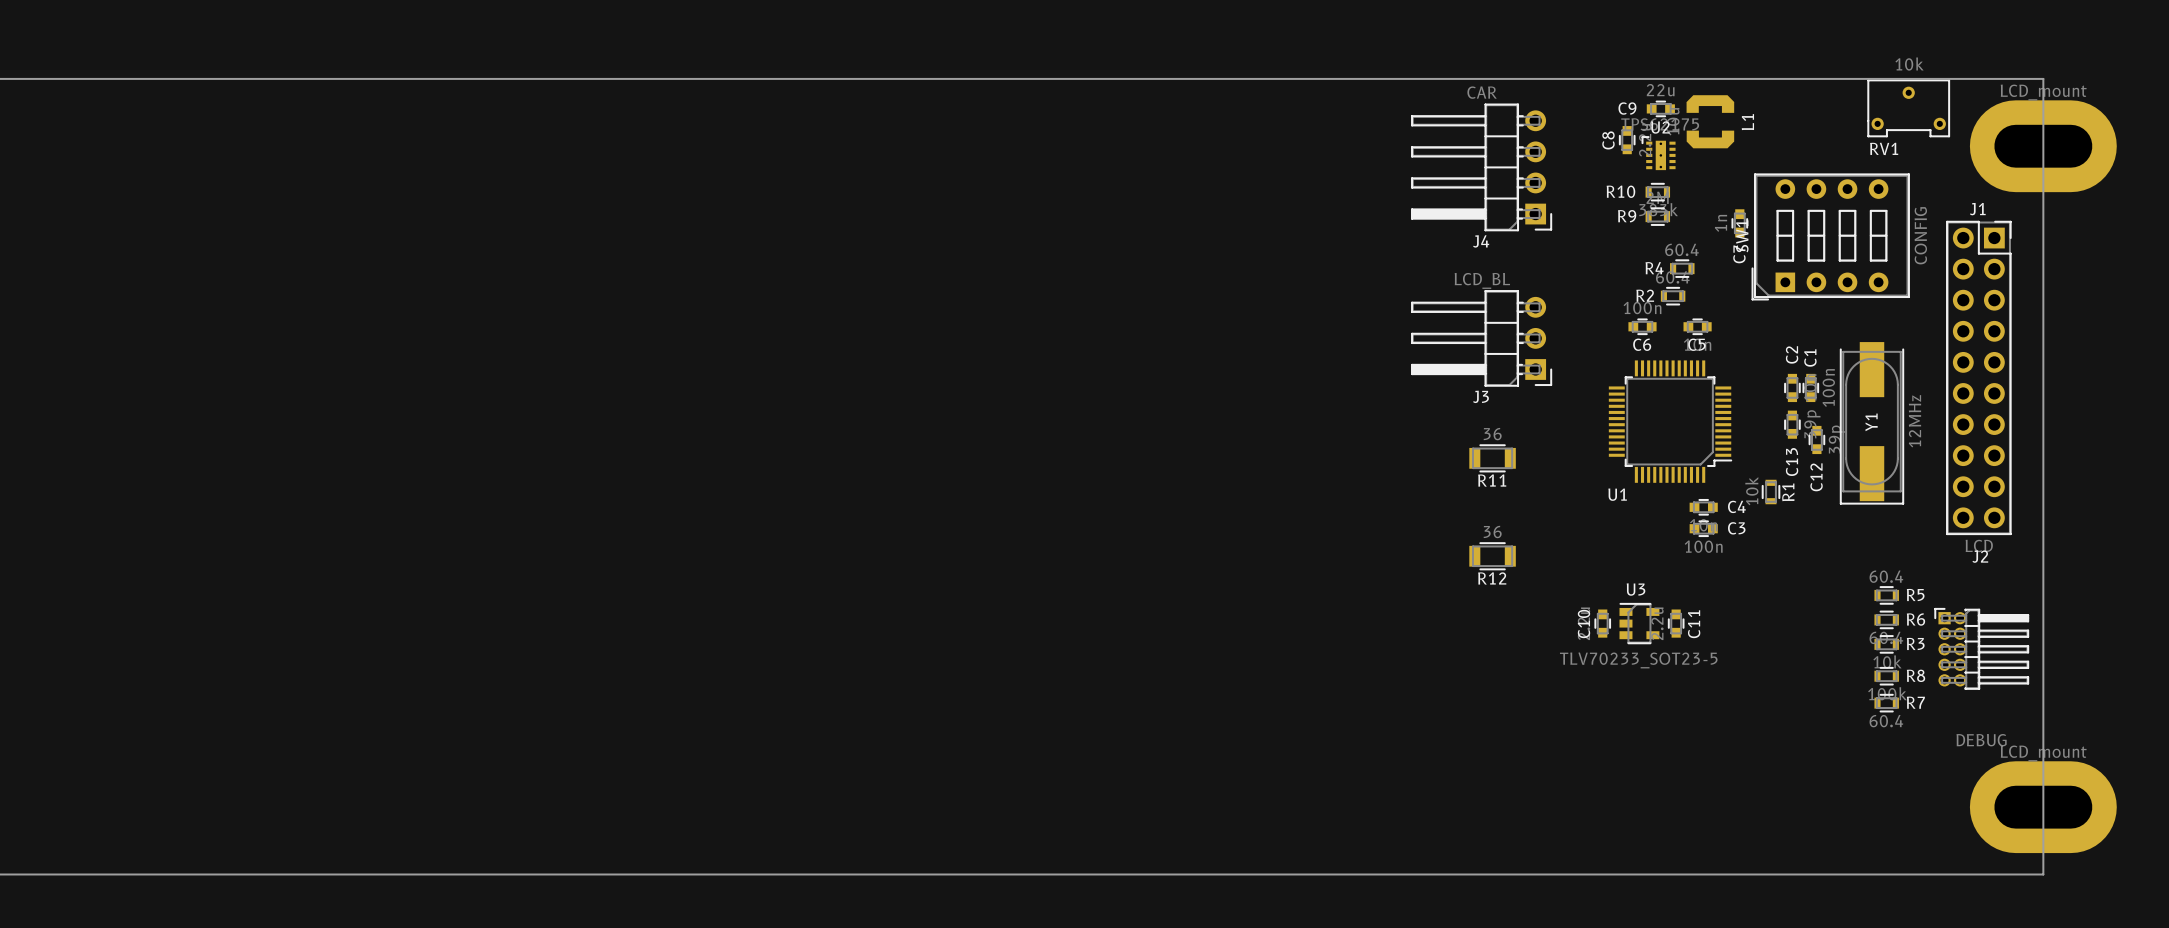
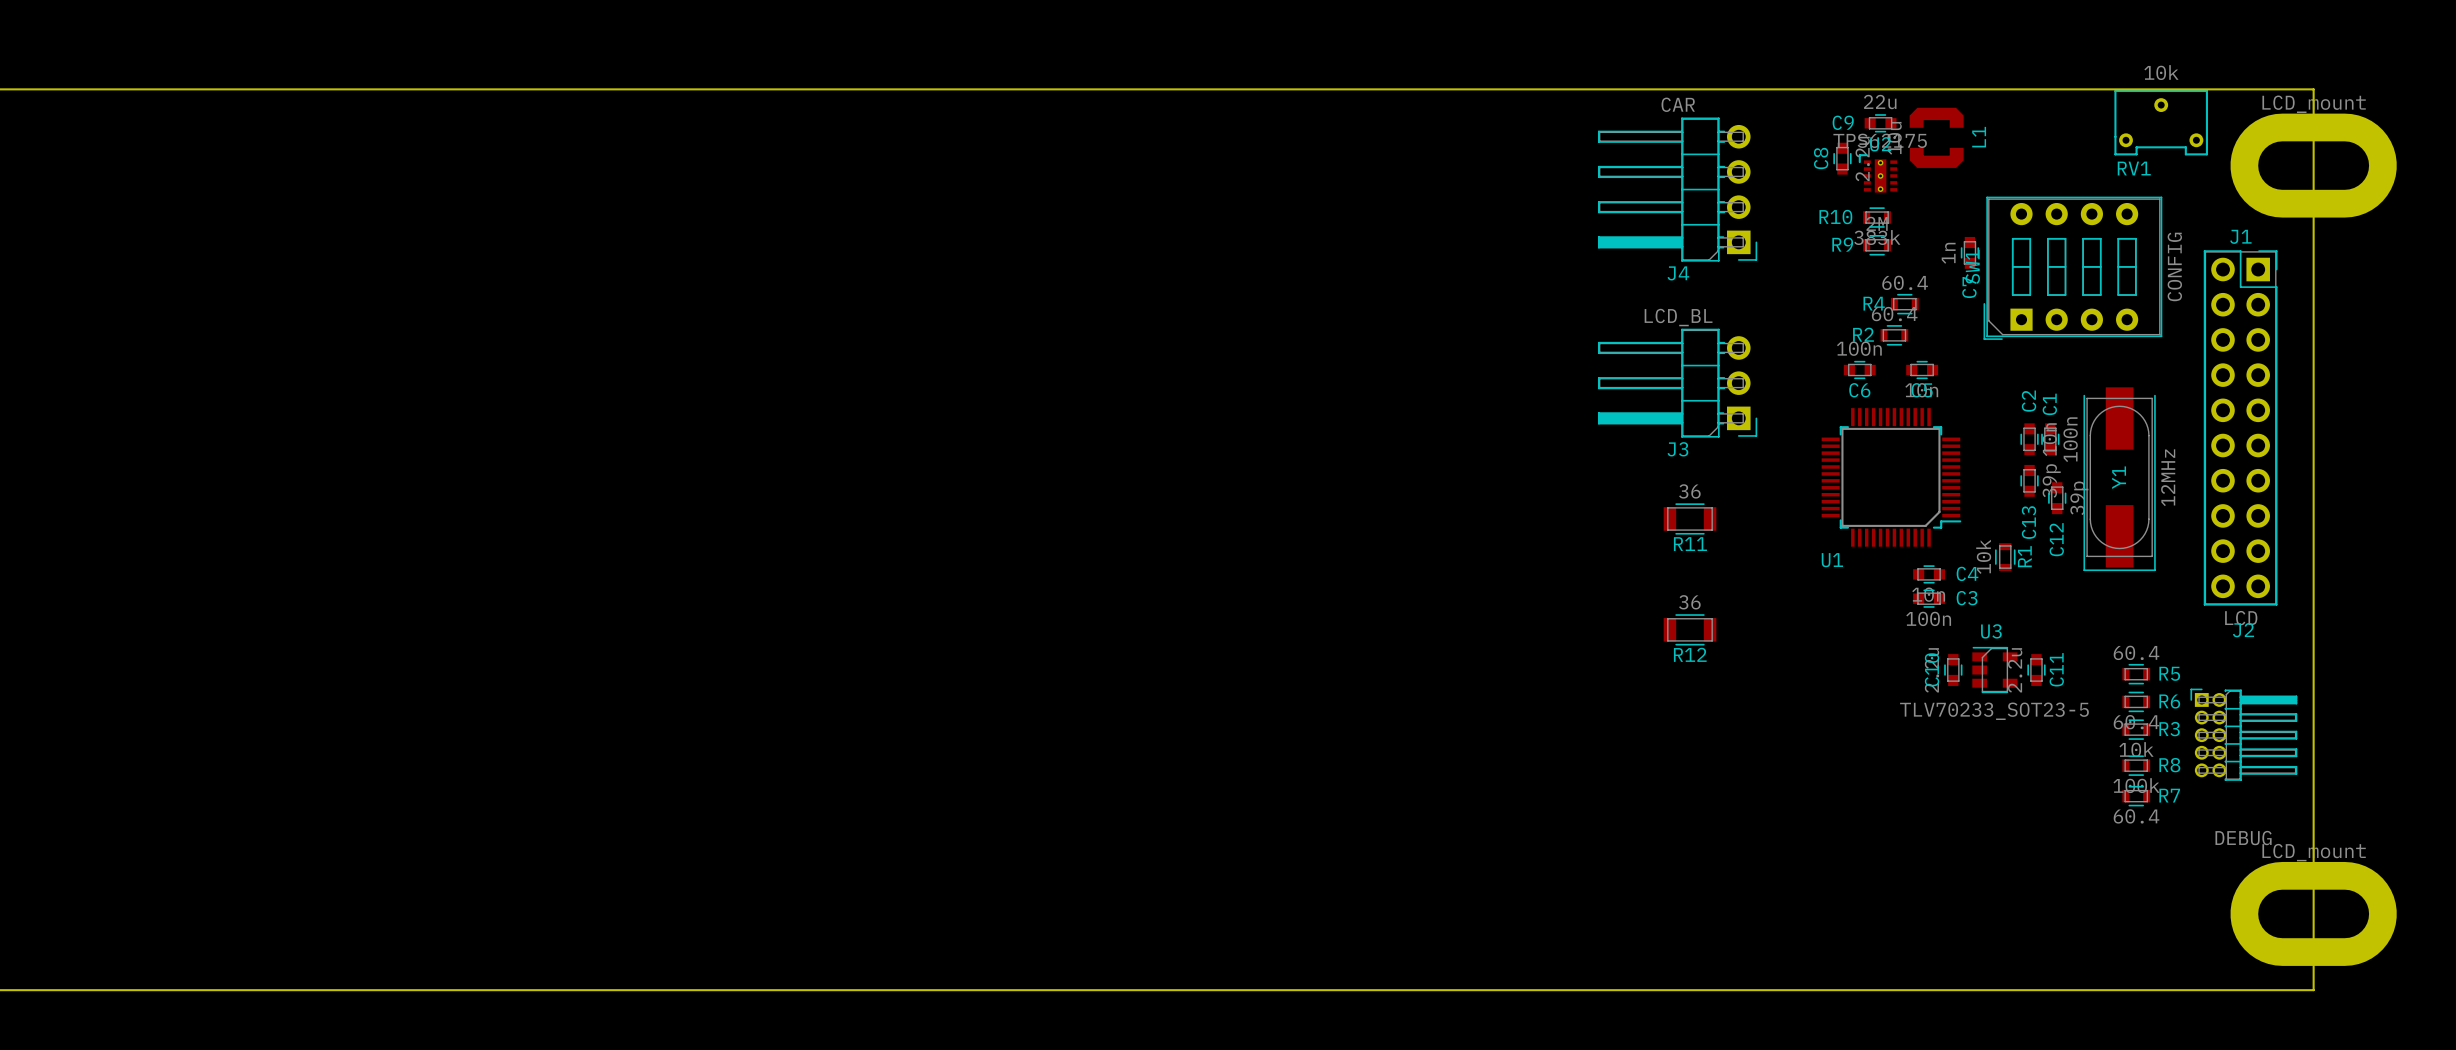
C10 position: (1602, 623) -> (1953, 670)
U3 position: (1639, 623) -> (1994, 670)
C11 position: (1676, 623) -> (2036, 670)

